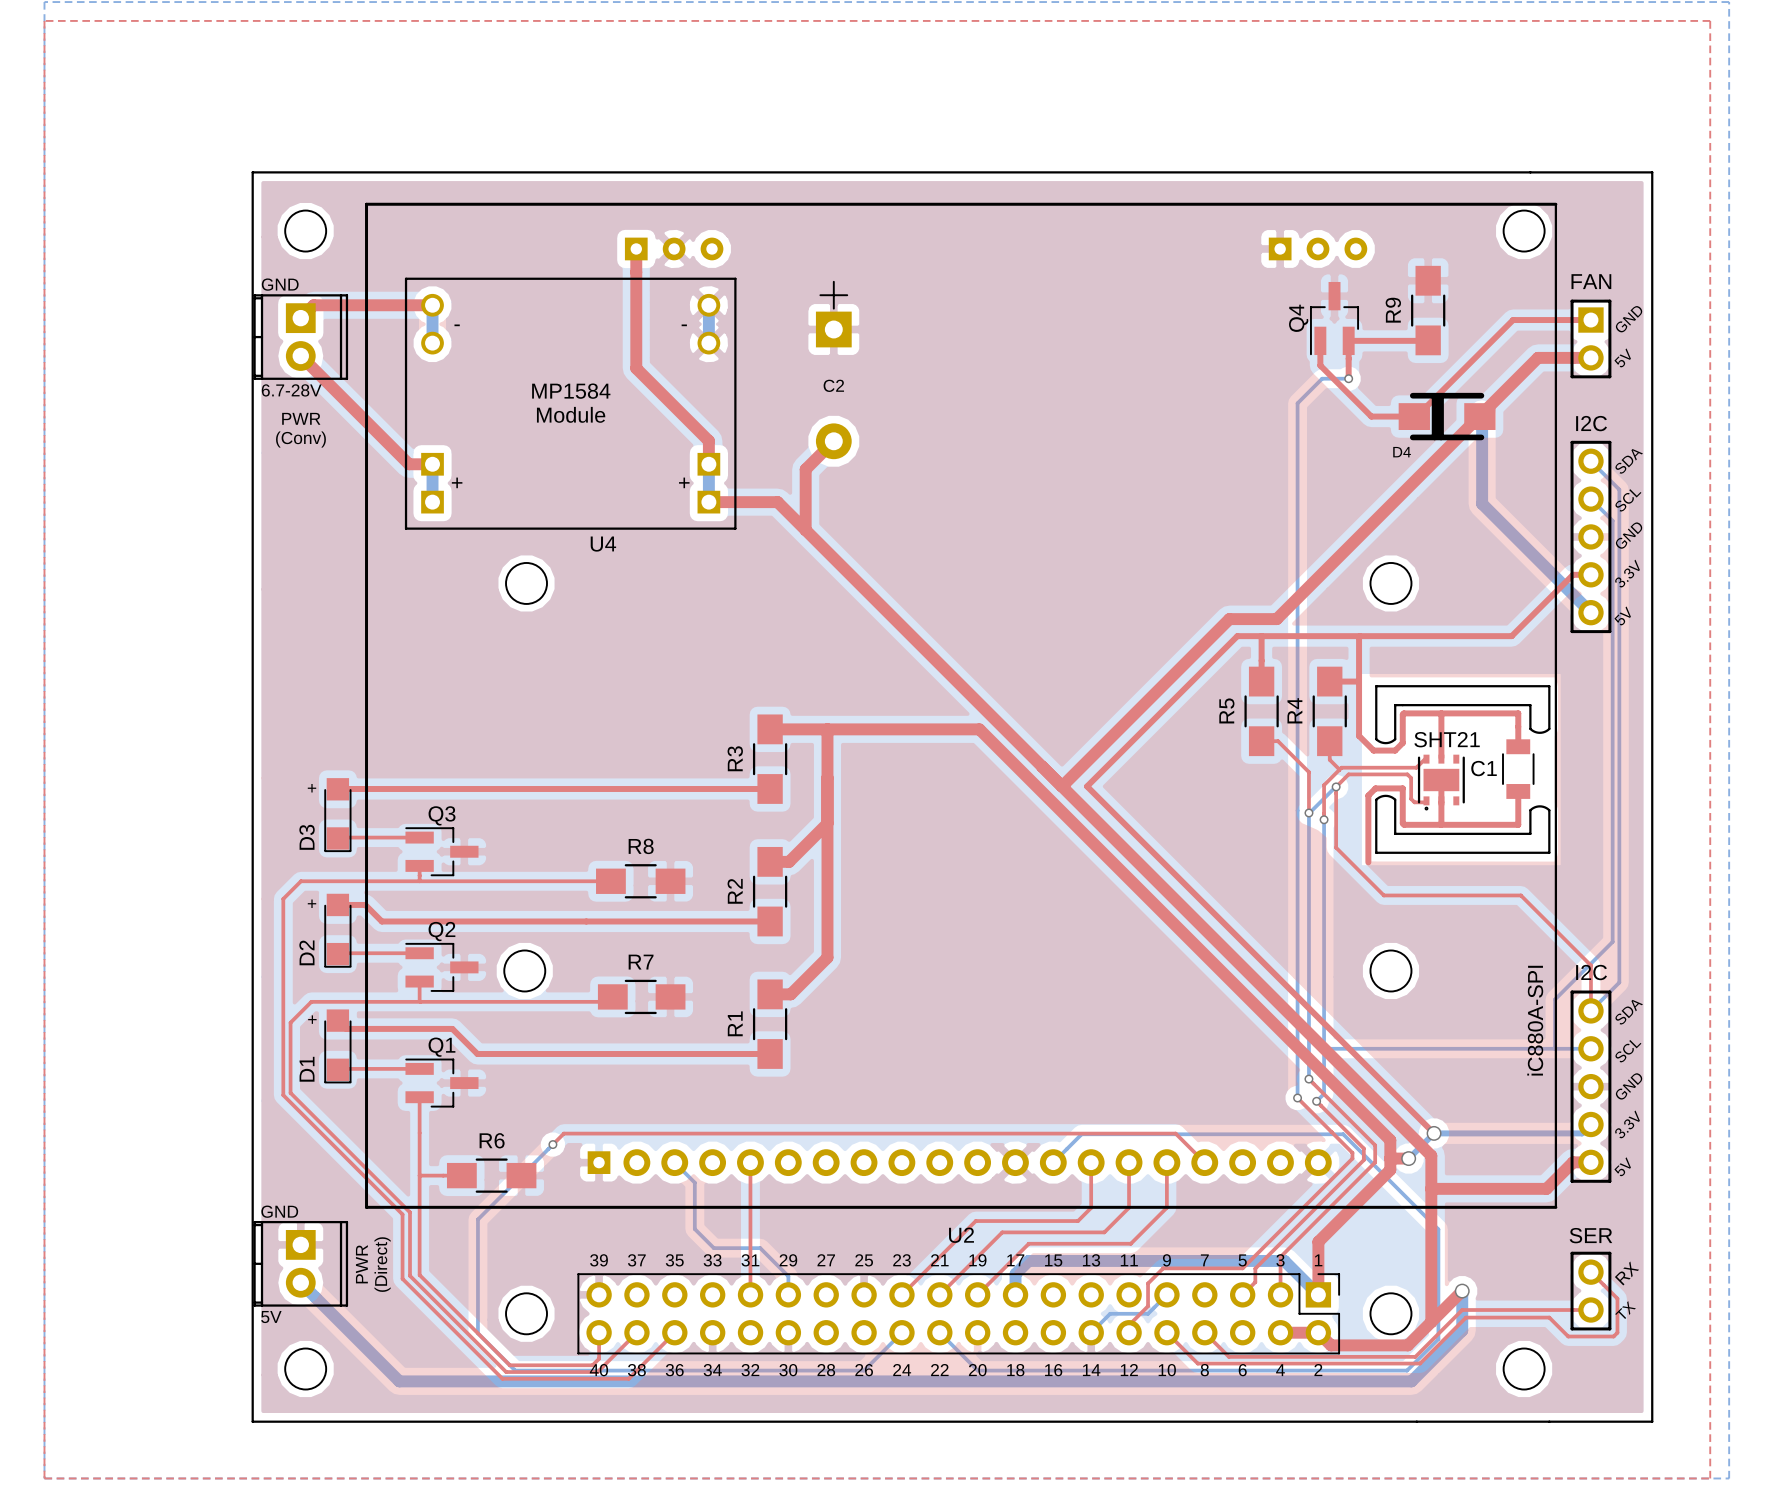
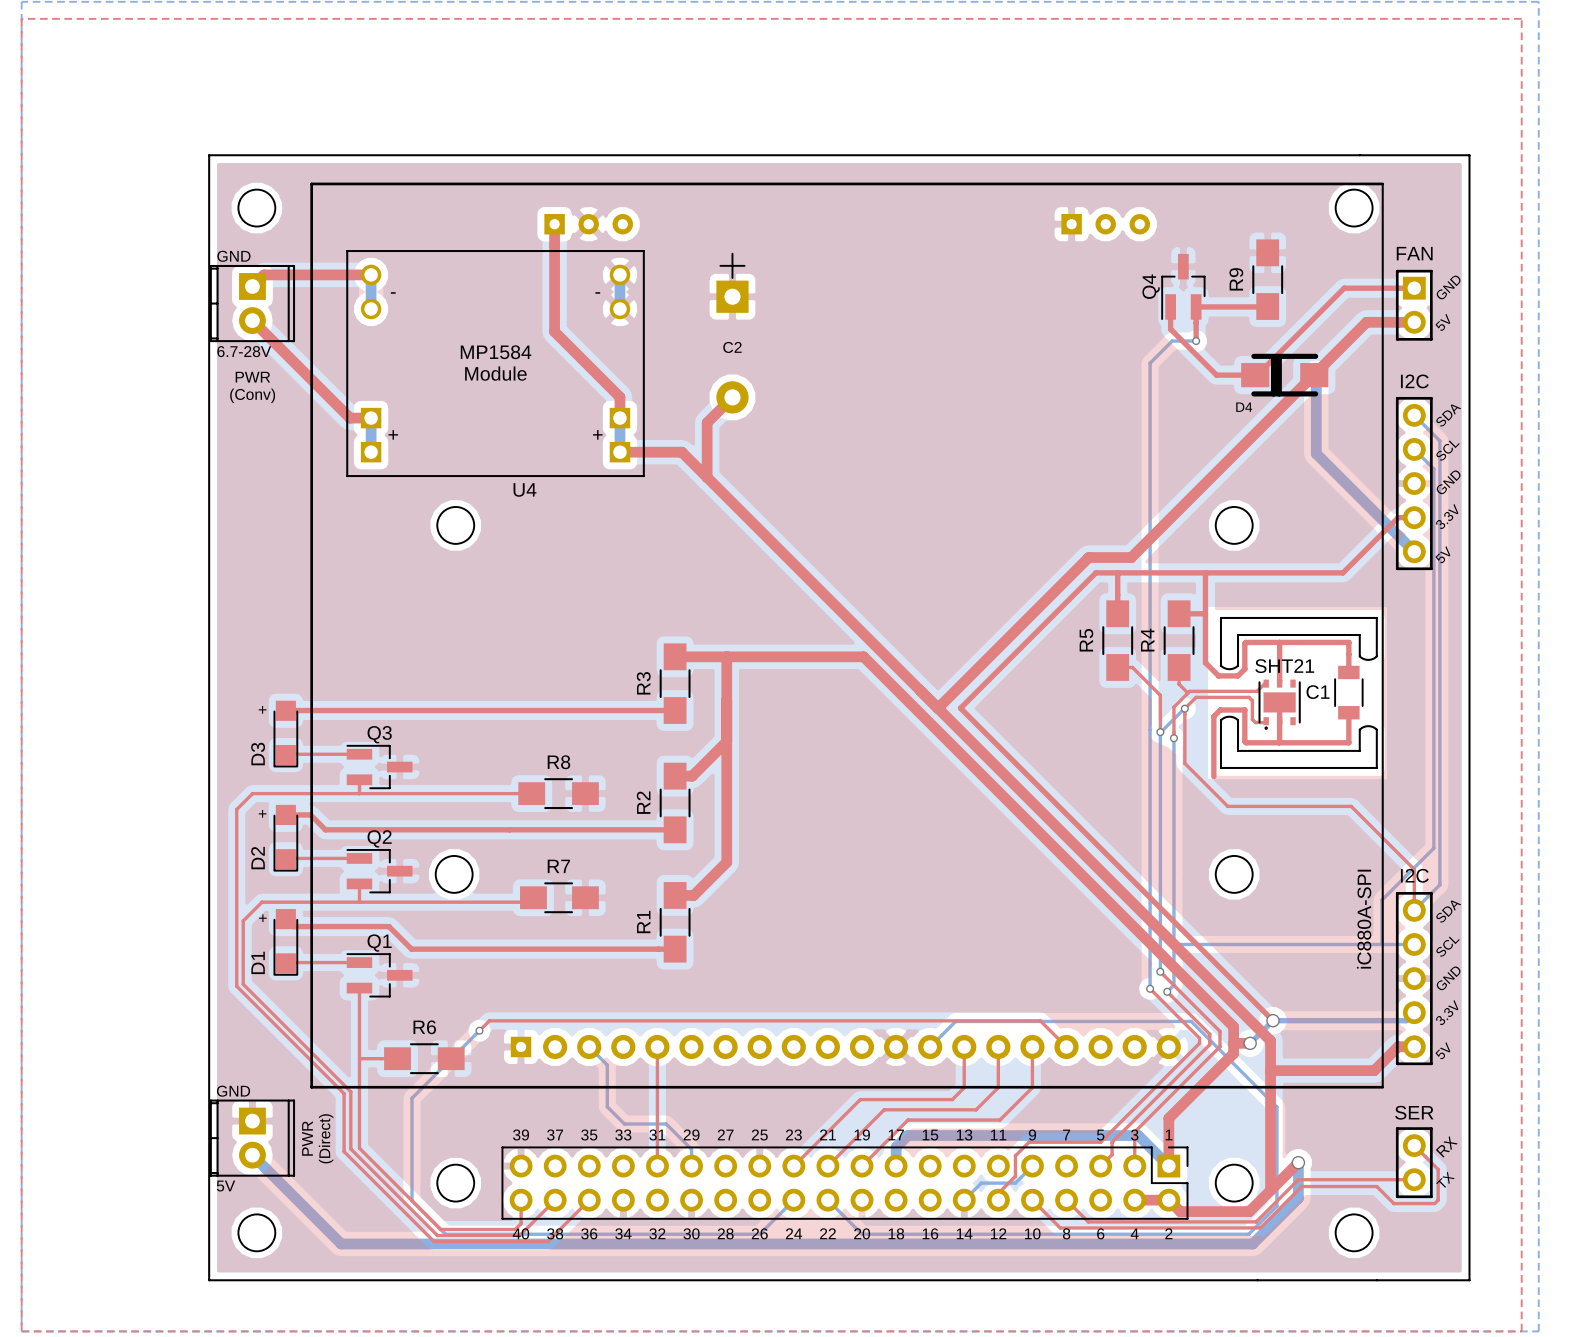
U2: (961, 705) -> none
part: none -> (847, 635)

